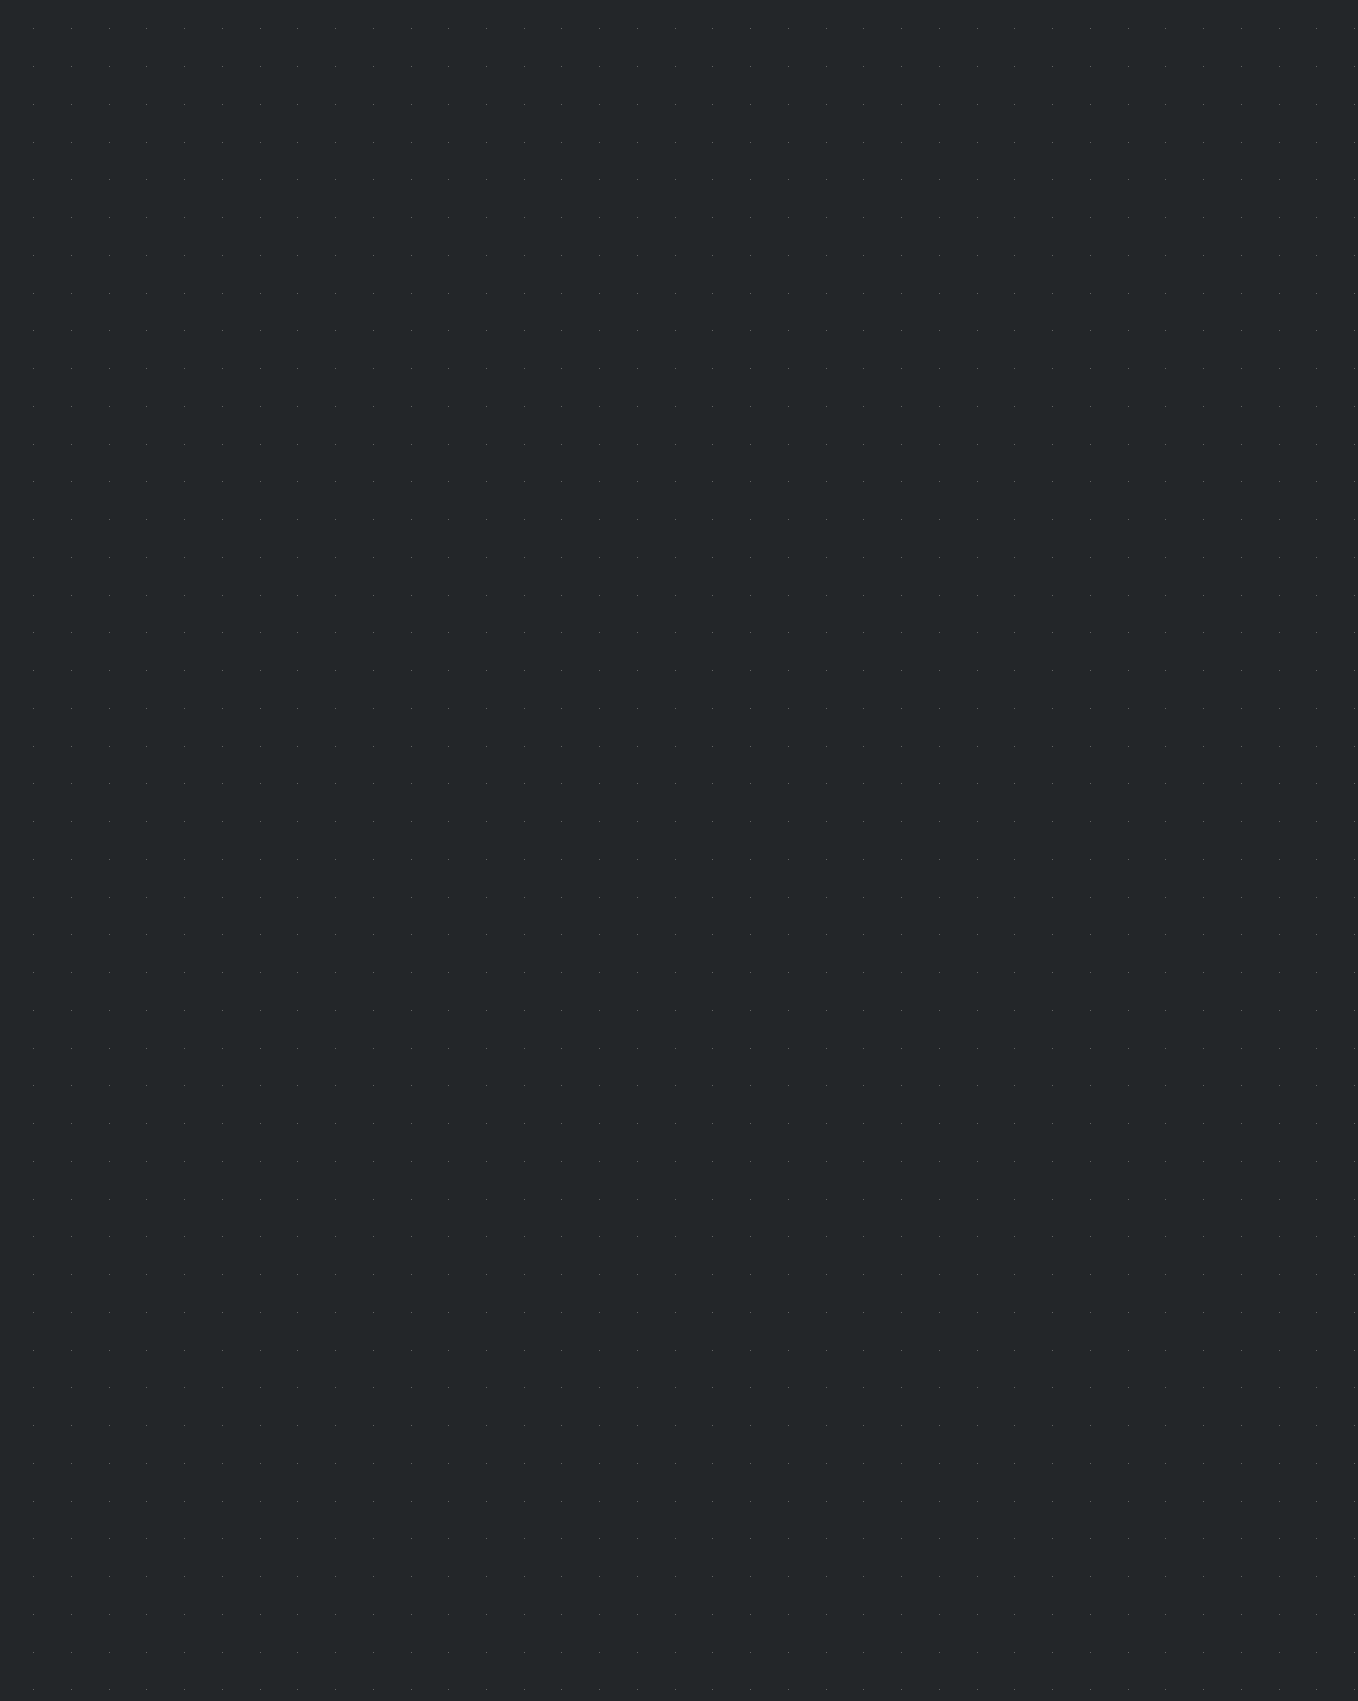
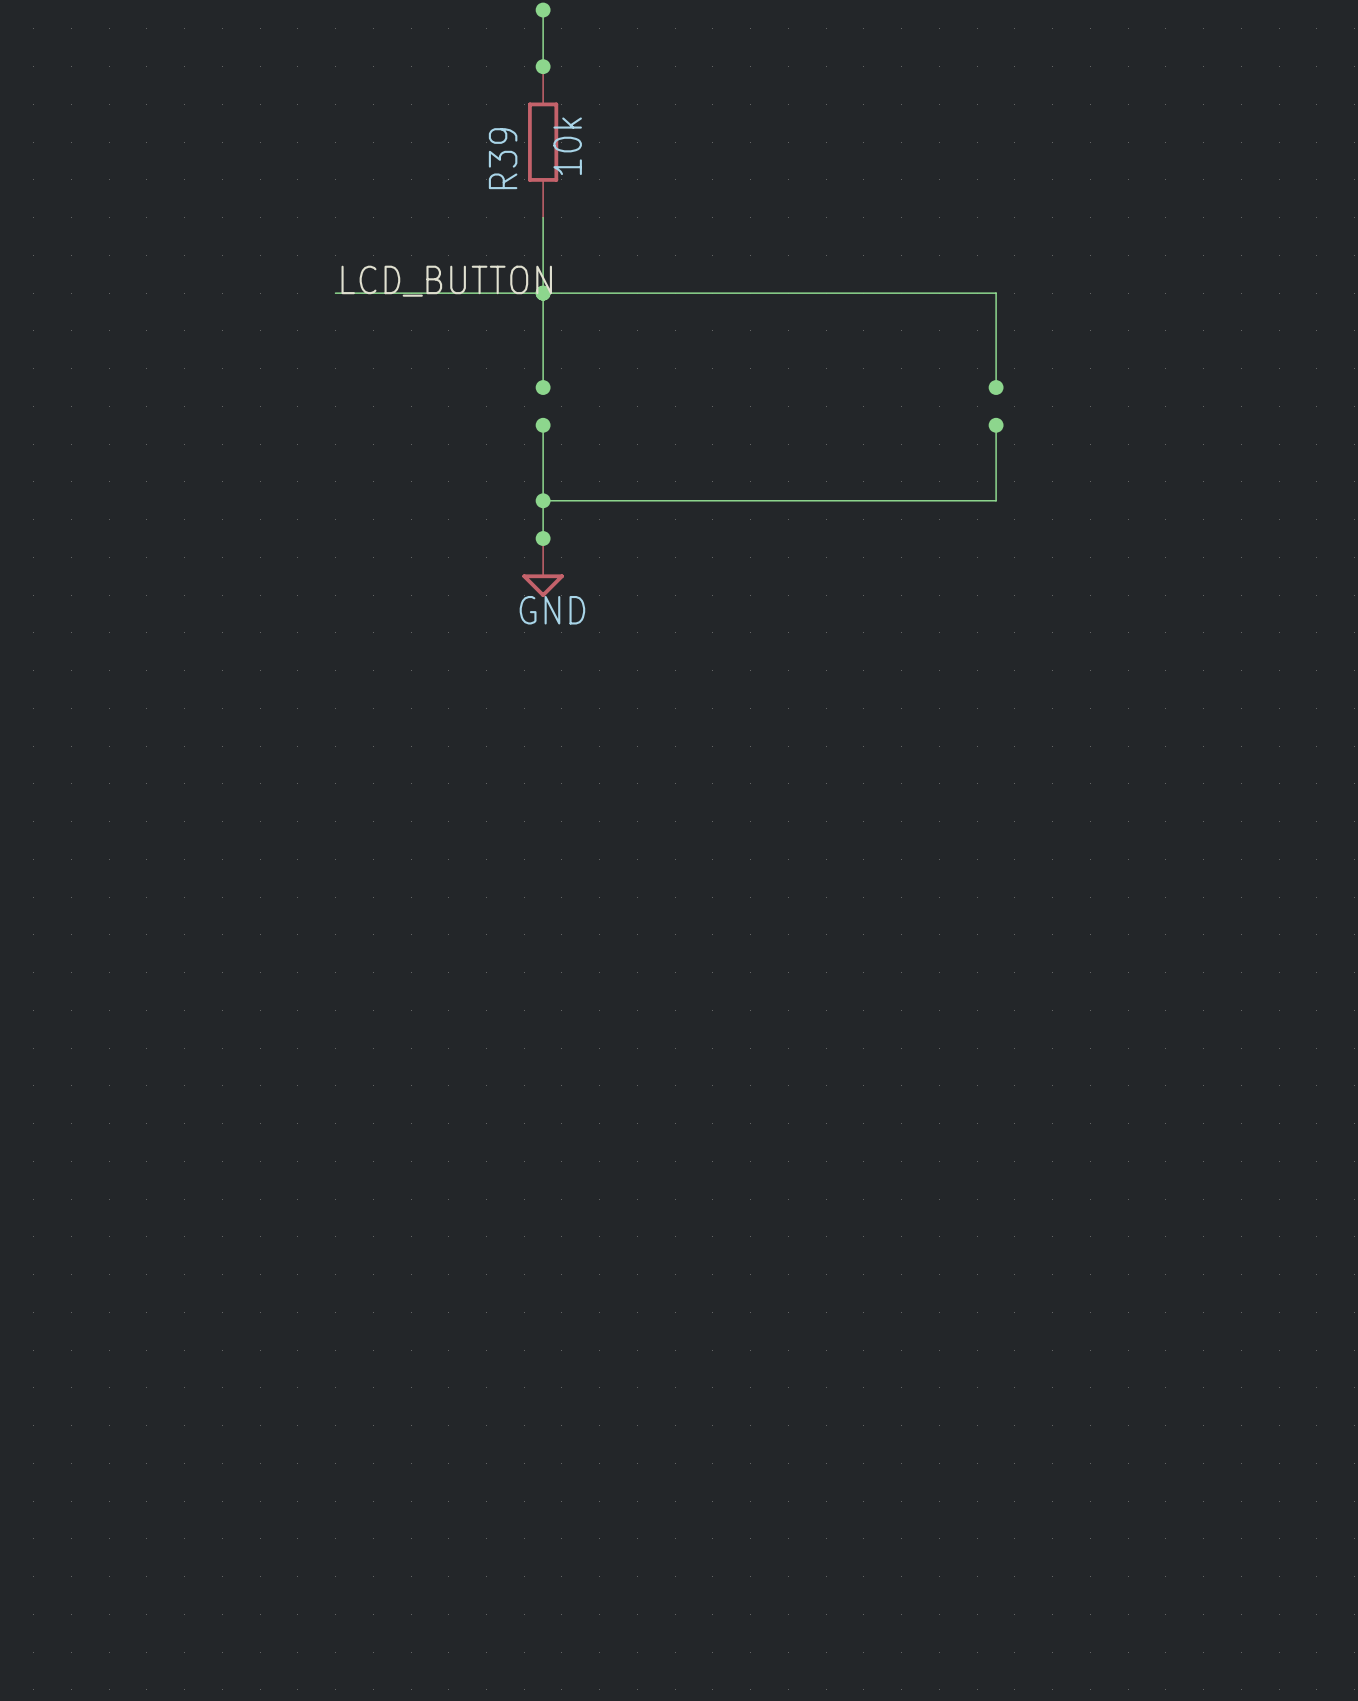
wire: none -> (543, 10) (543, 66)
junction: none -> (543, 10)
junction: none -> (543, 66)
R39: none -> 10k (543, 142)
wire: none -> (543, 217) (543, 387)
label: none -> LCD_BUTTON (446, 281)
wire: none -> (335, 293) (996, 293) (996, 387)
junction: none -> (543, 293)
junction: none -> (543, 387)
junction: none -> (996, 387)
wire: none -> (543, 425) (543, 538)
junction: none -> (543, 425)
wire: none -> (996, 425) (996, 500) (543, 500)
junction: none -> (996, 425)
junction: none -> (543, 500)
junction: none -> (543, 538)
power symbol: none -> GND (543, 567)

